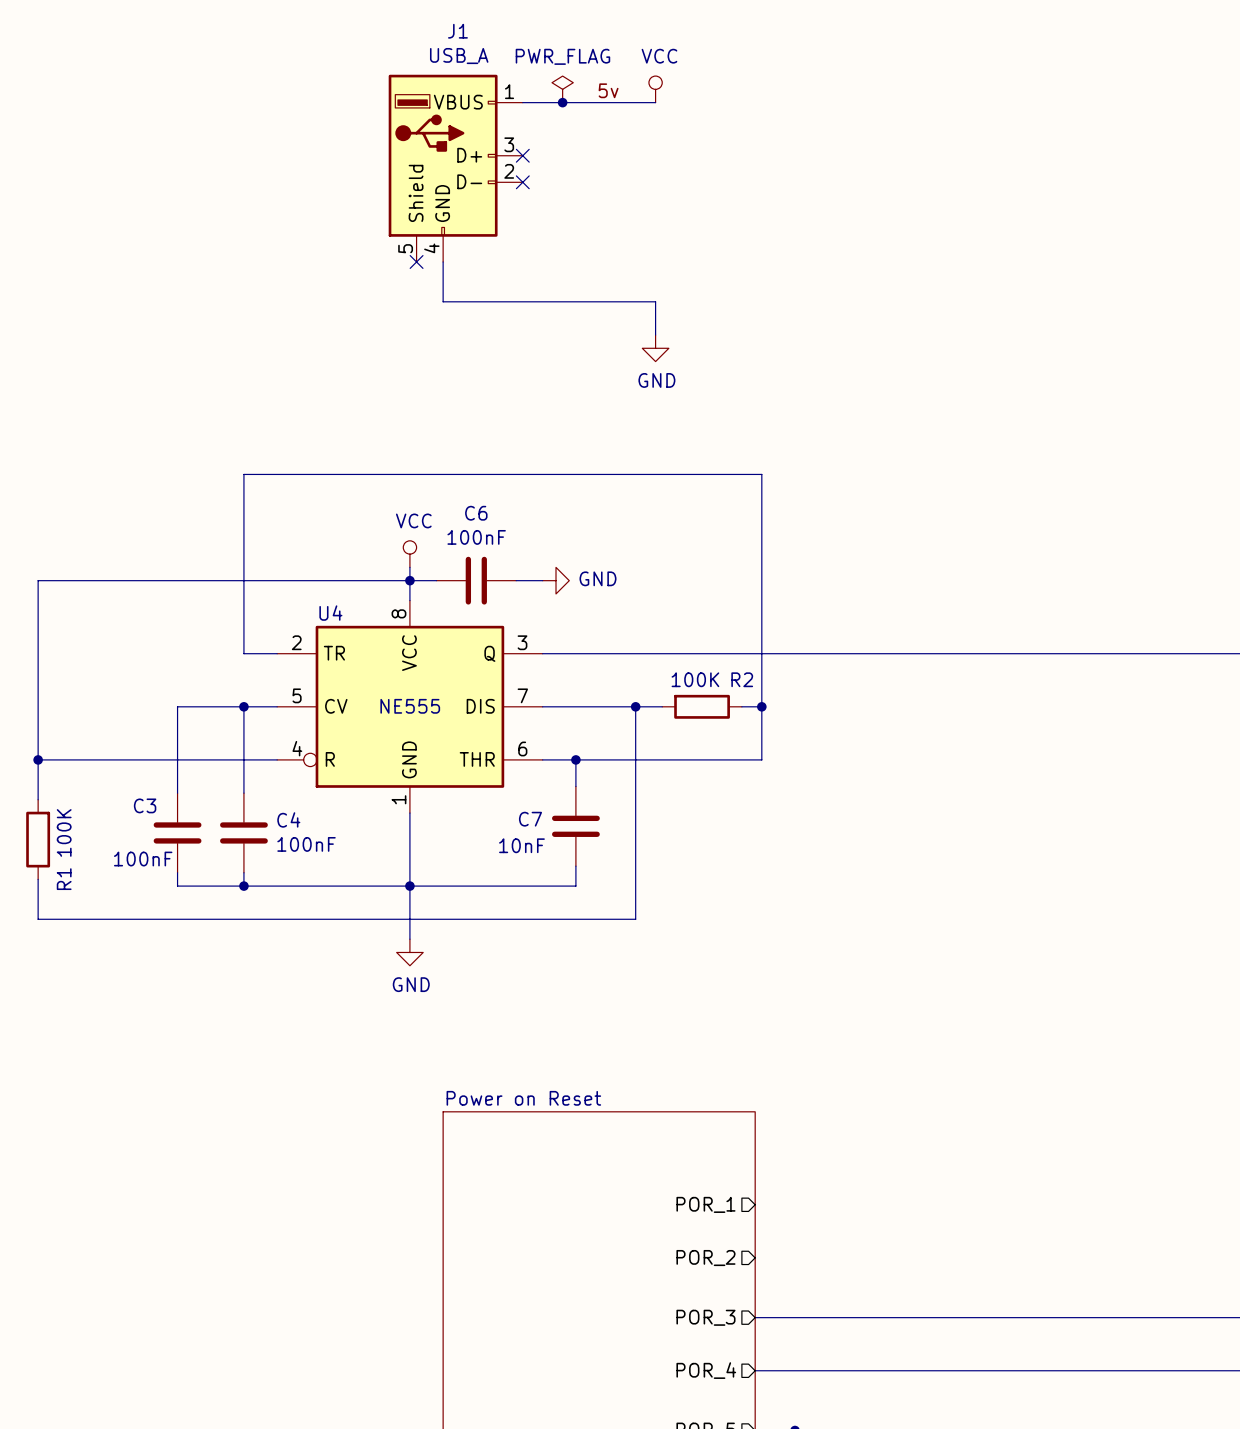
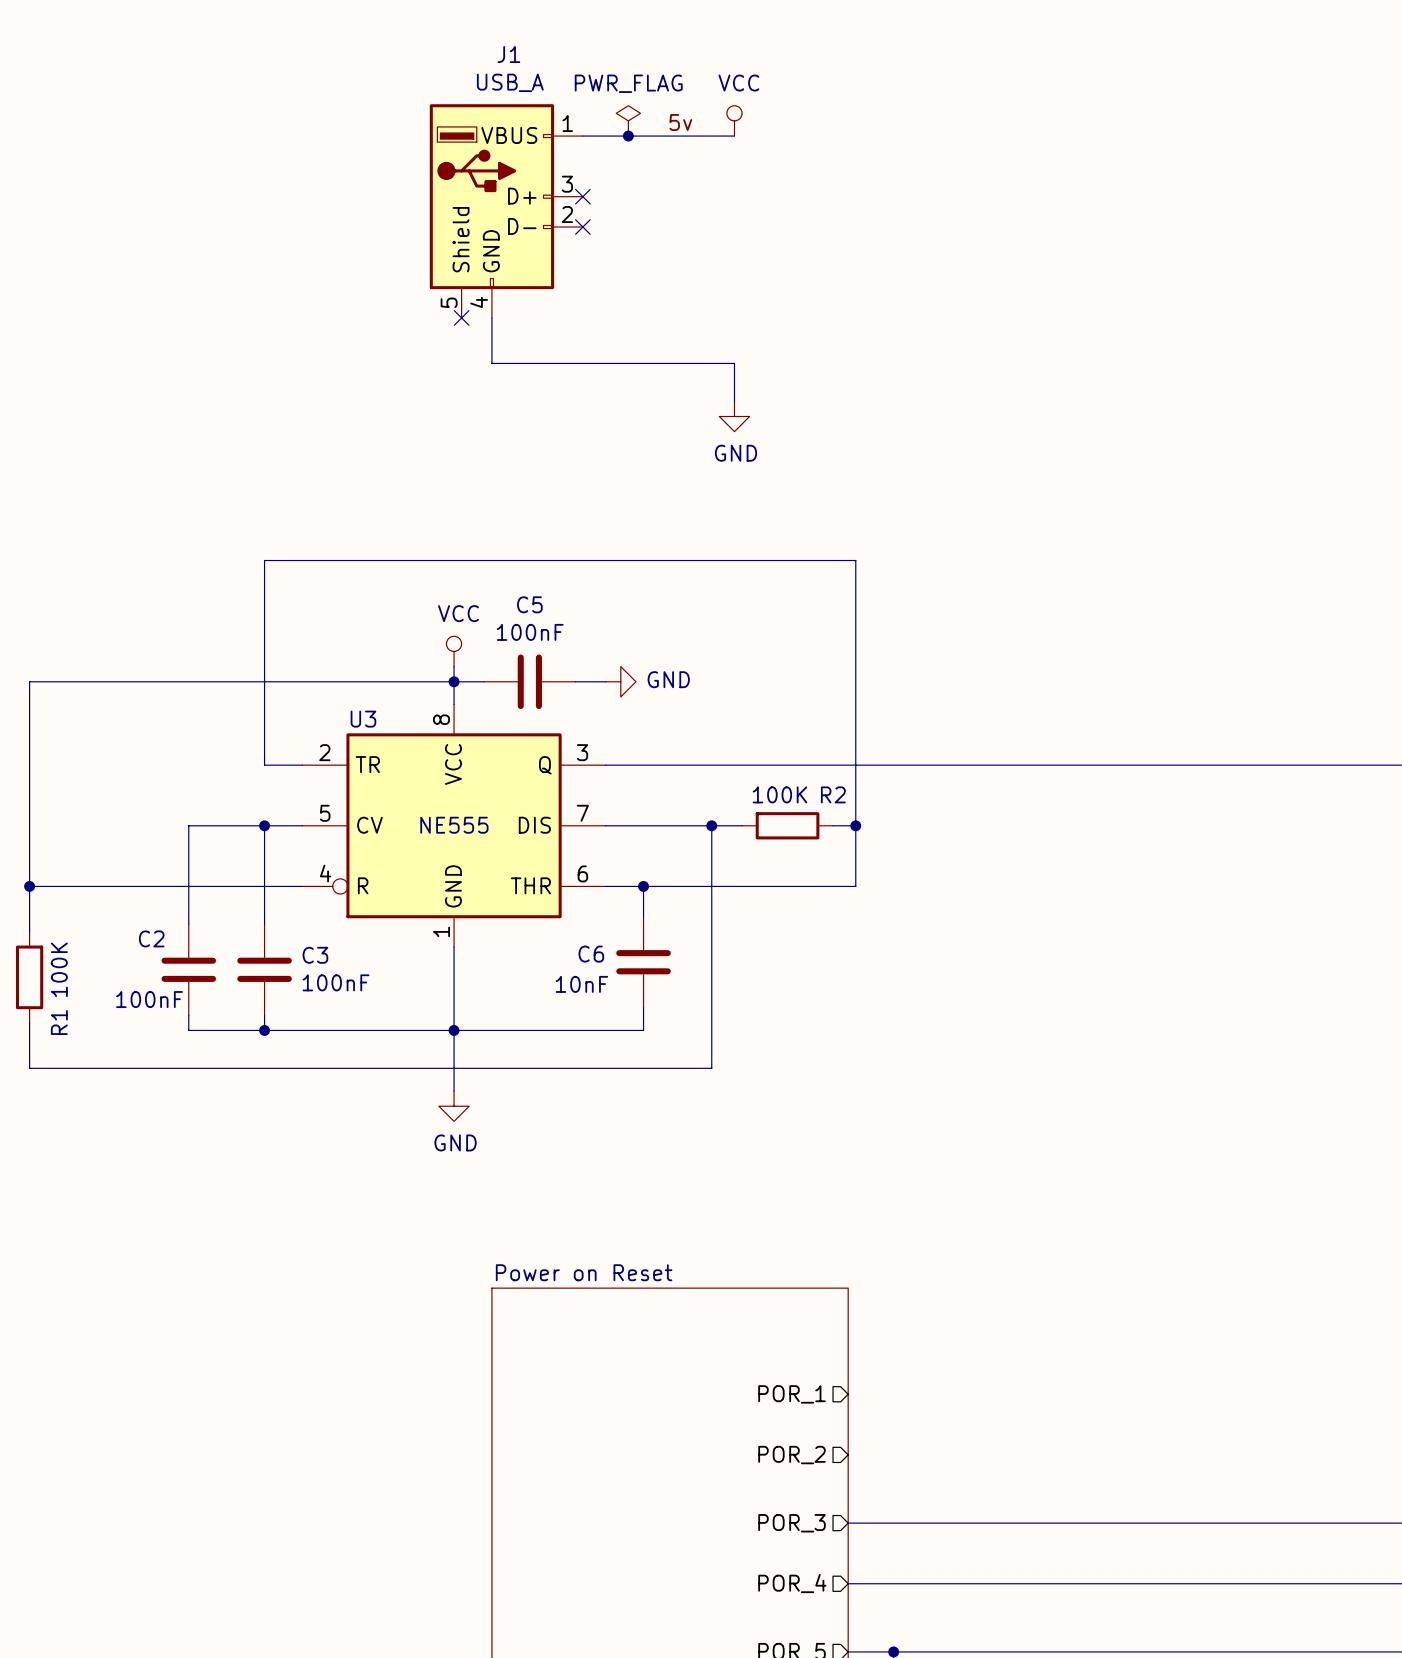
C6 name: C6 (476, 513) -> C5 (529, 604)
U4 name: U4 (330, 613) -> U3 (363, 719)
C3 name: C3 (145, 805) -> C2 (151, 938)
C4 name: C4 (288, 819) -> C3 (315, 955)
C7 name: C7 (530, 819) -> C6 (591, 954)

